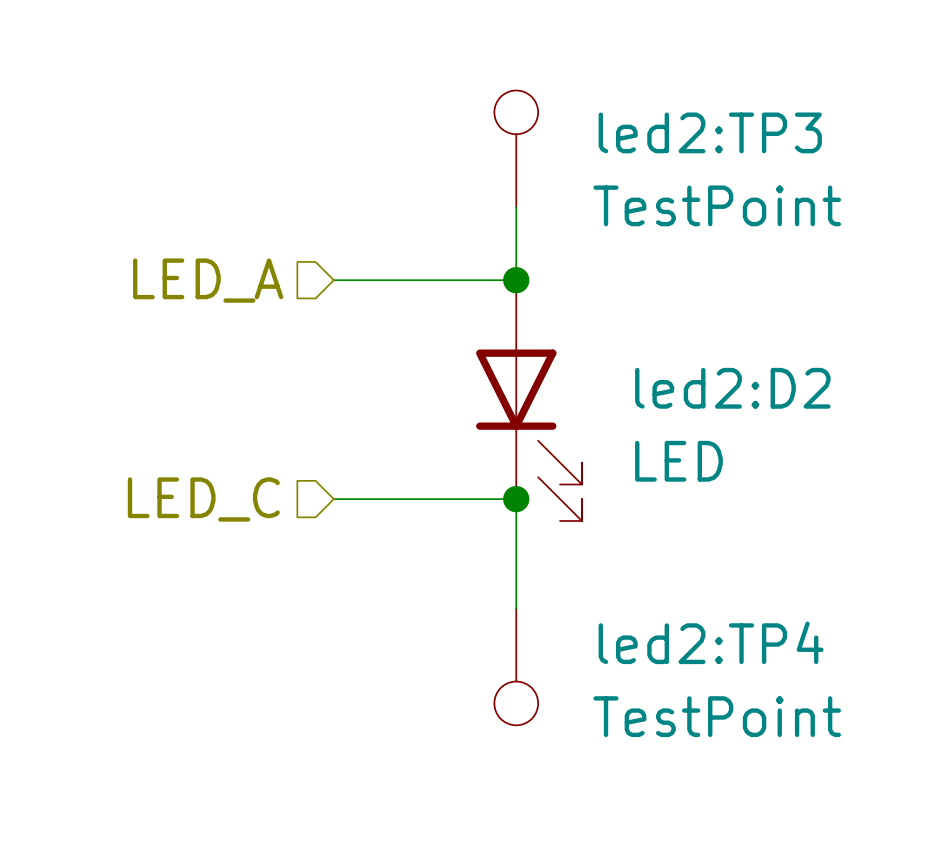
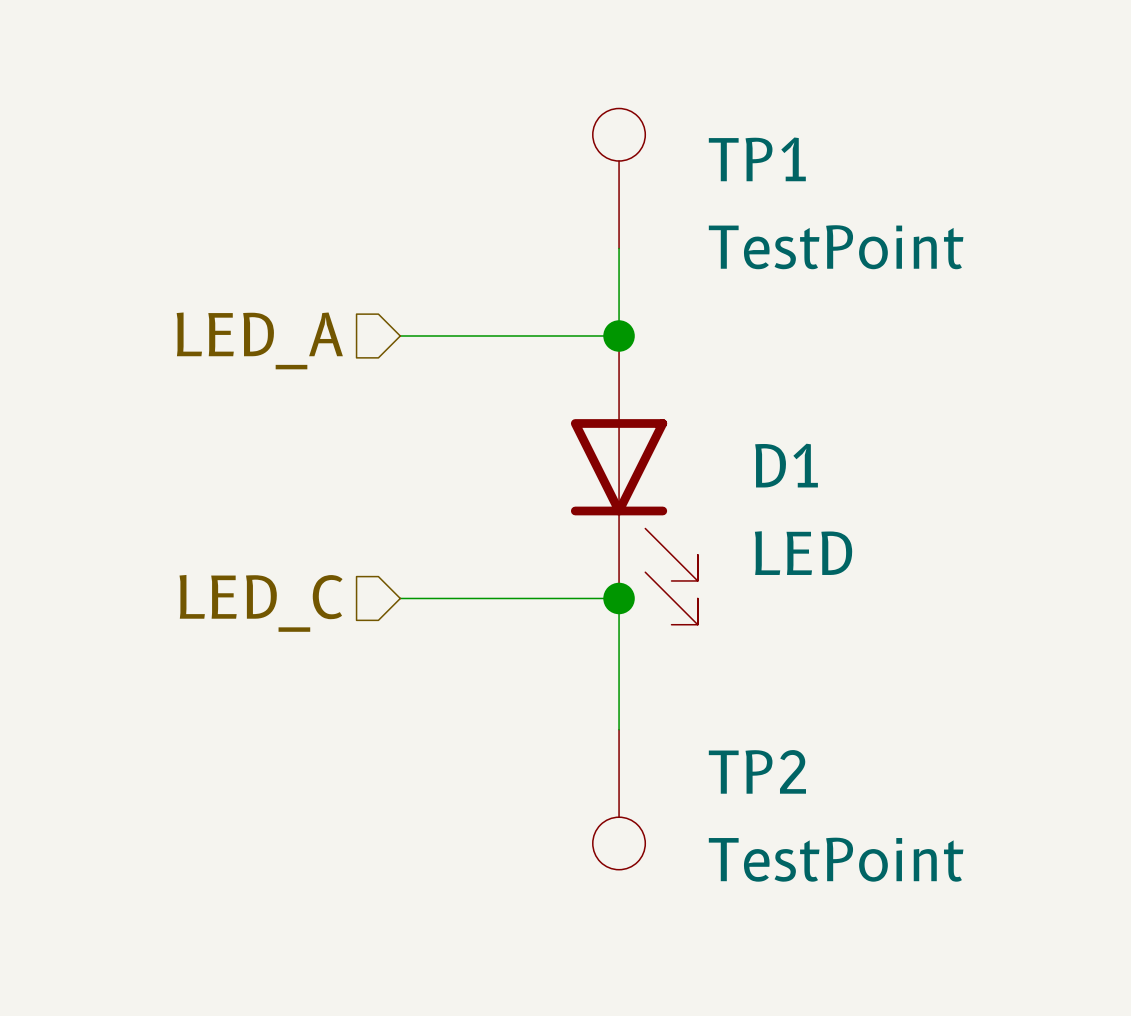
TP1 name: led2:TP3 (710, 132) -> TP1 (757, 159)
D1 name: led2:D2 (732, 388) -> D1 (786, 465)
TP2 name: led2:TP4 (711, 642) -> TP2 (757, 771)

